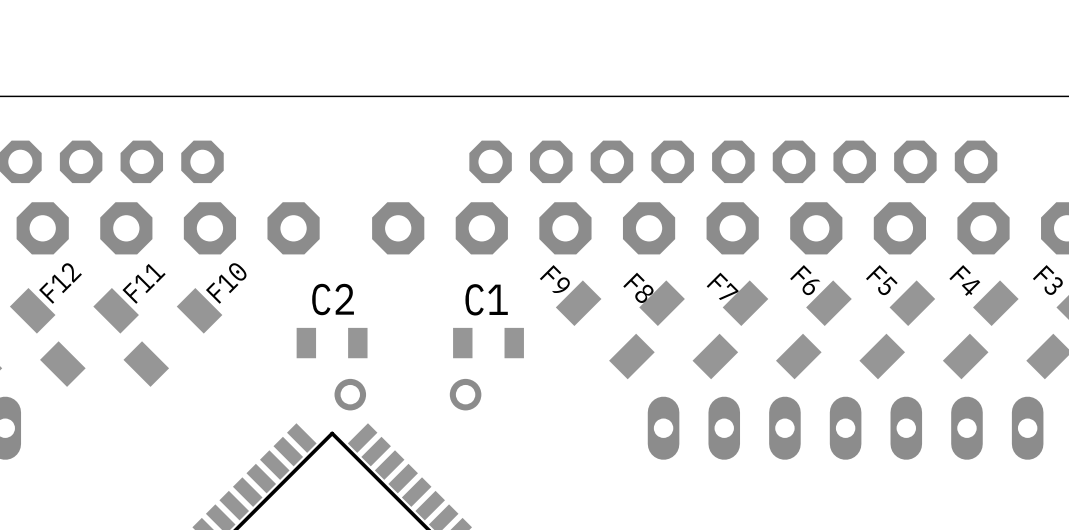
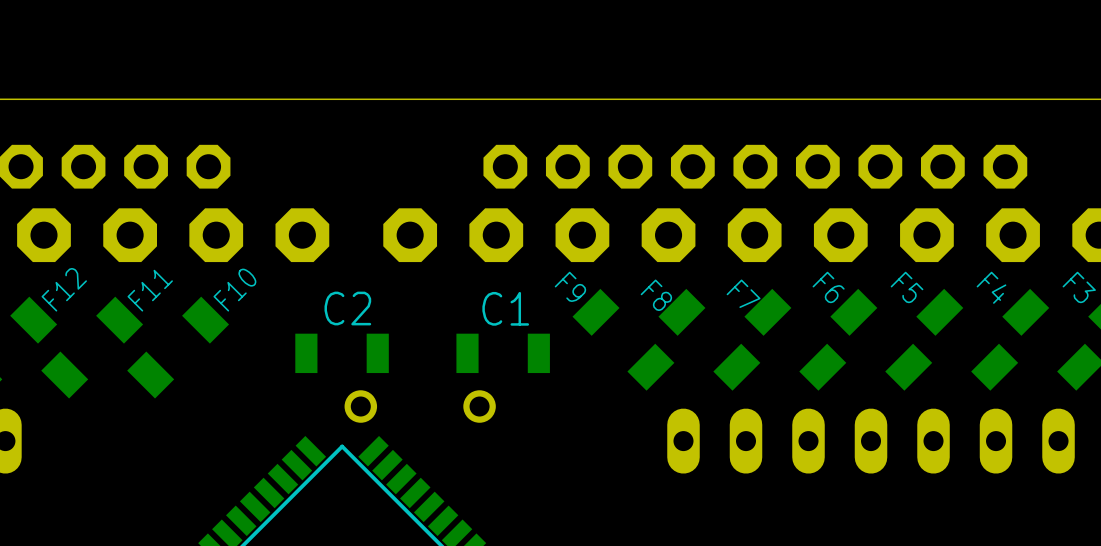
C2 footprint: [296, 327, 368, 359] -> [295, 333, 389, 374]
C1 footprint: [453, 327, 524, 359] -> [456, 333, 550, 374]

